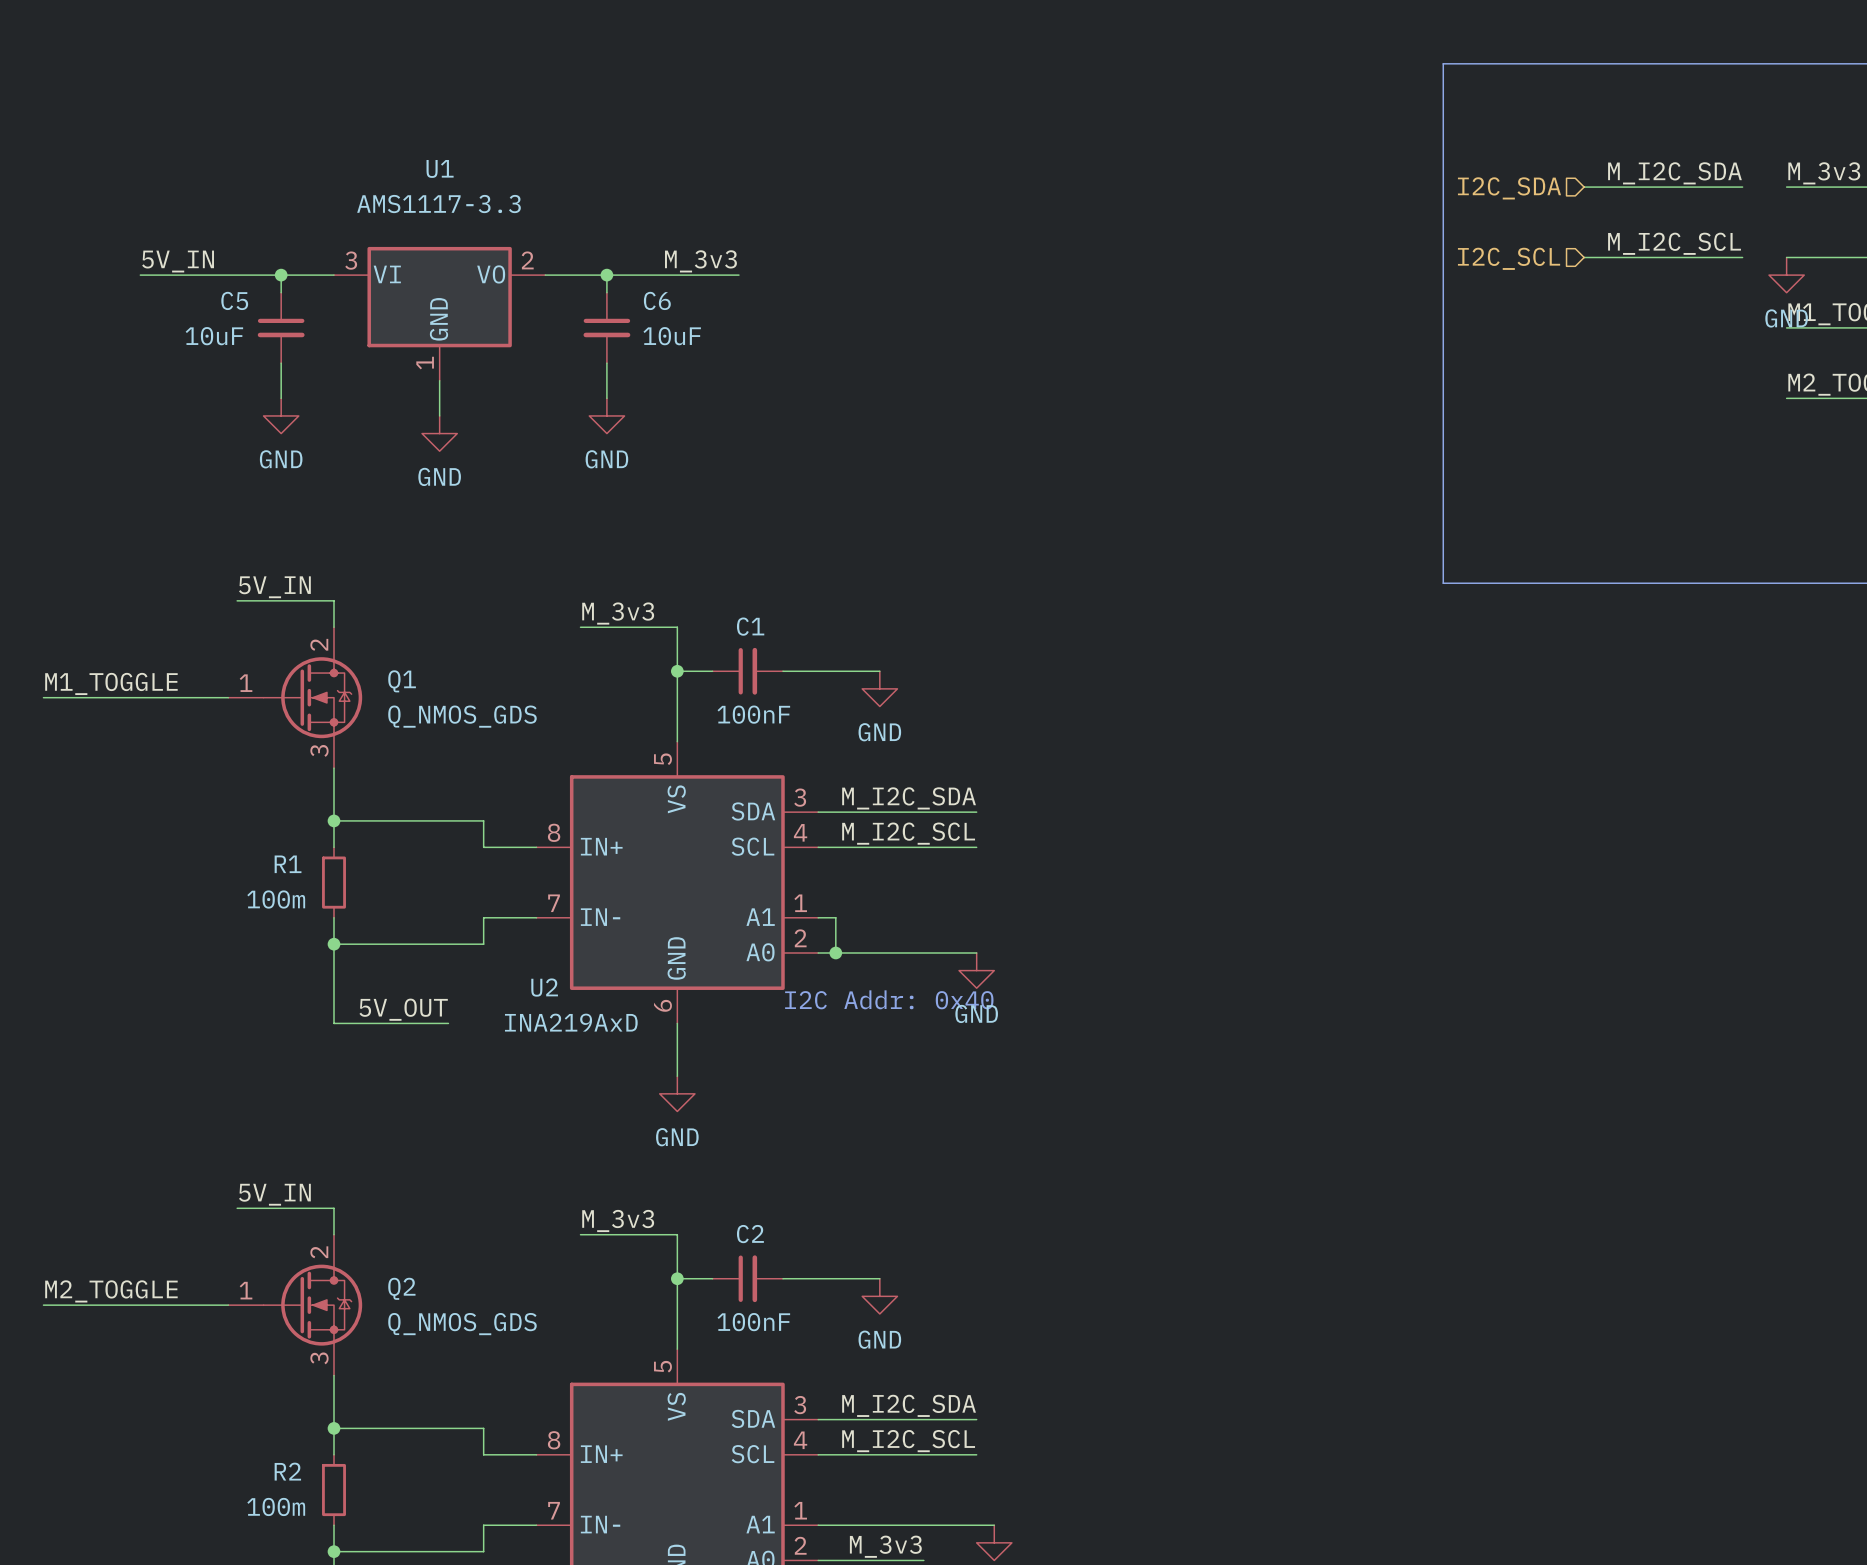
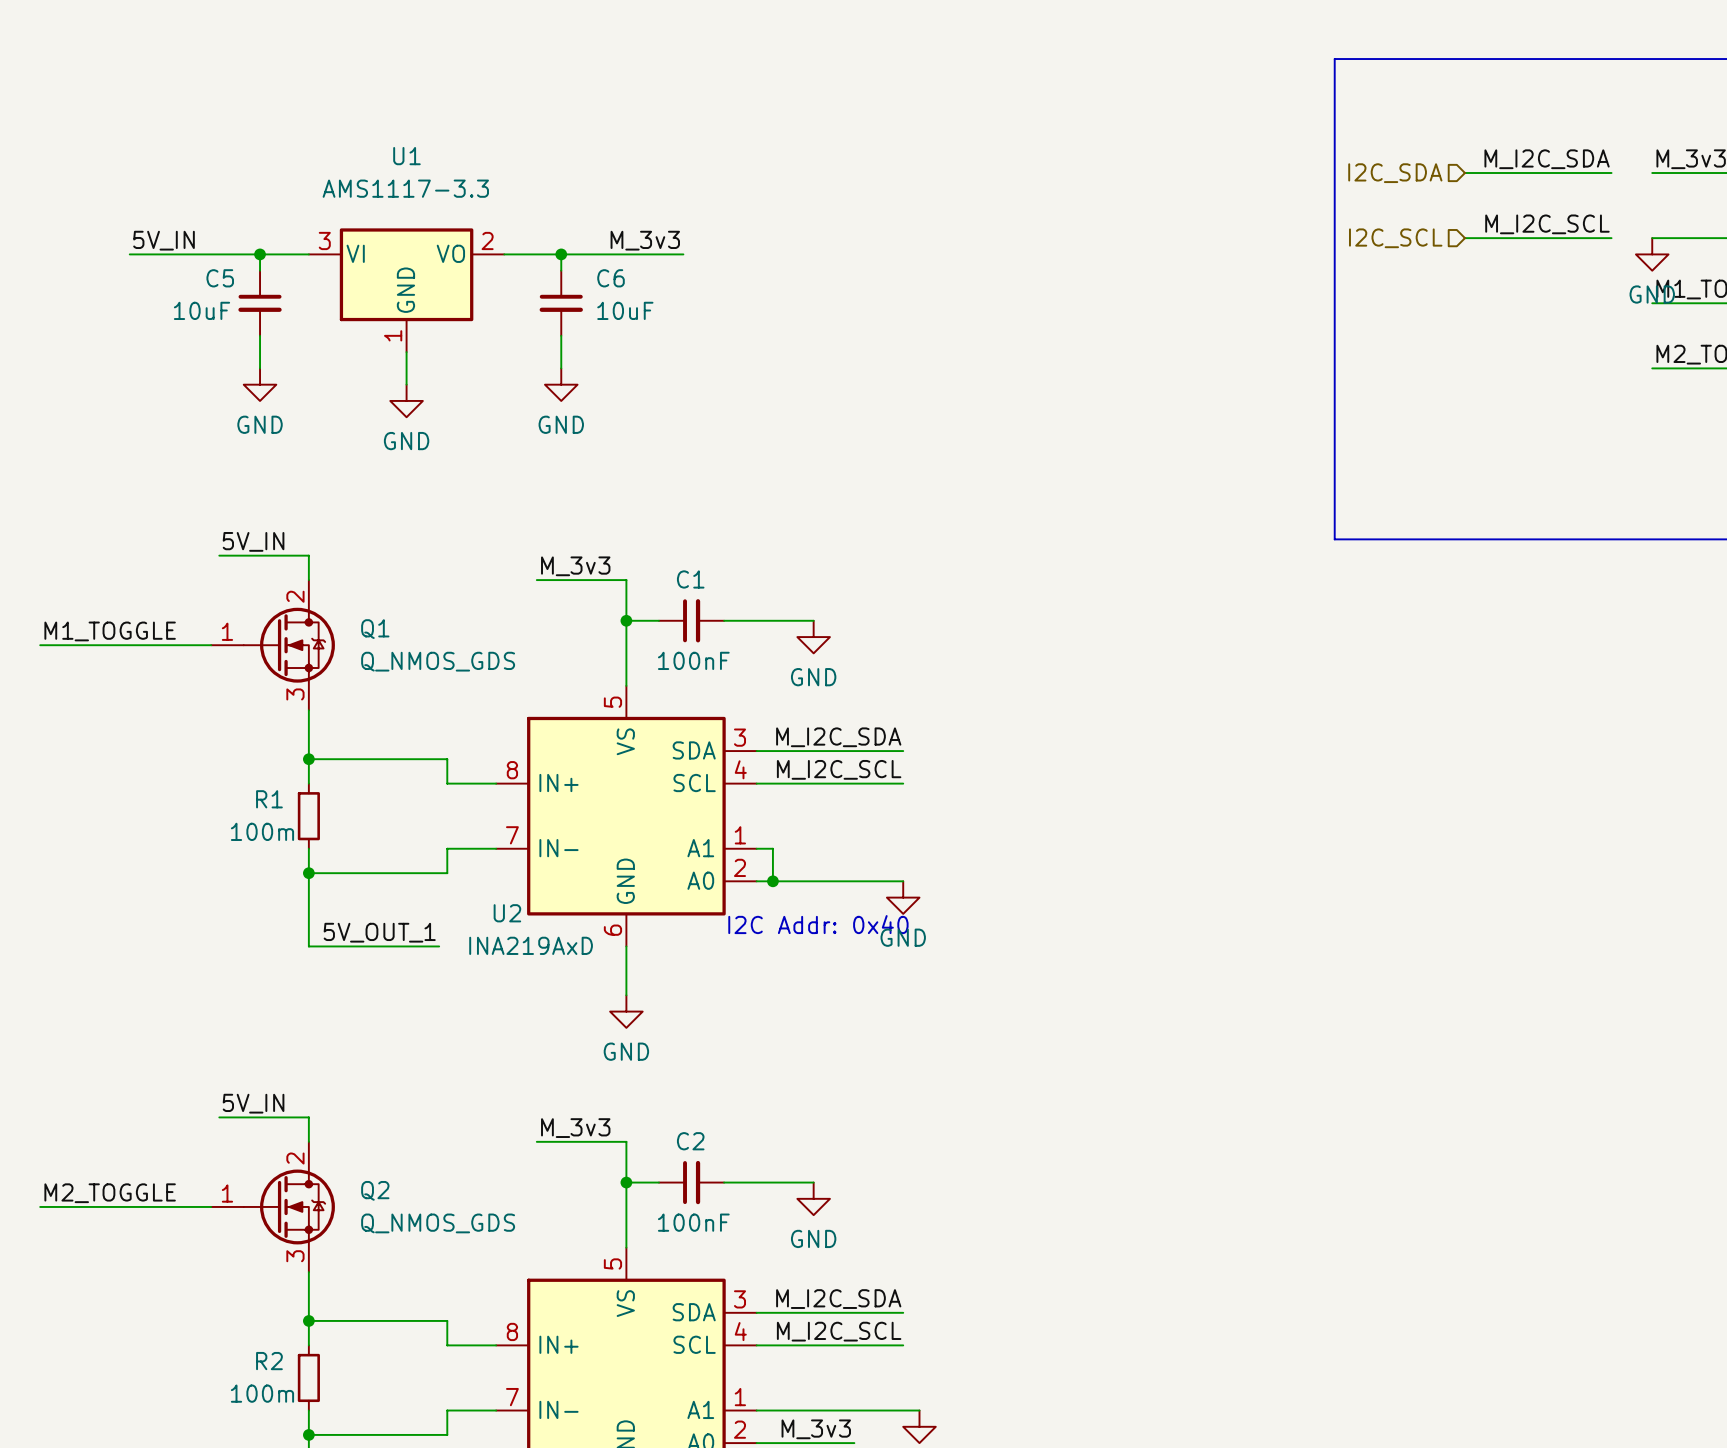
label: 5V_OUT (403, 1009) -> 5V_OUT_1 (379, 932)
wire: none -> (414, 946) (439, 946)

